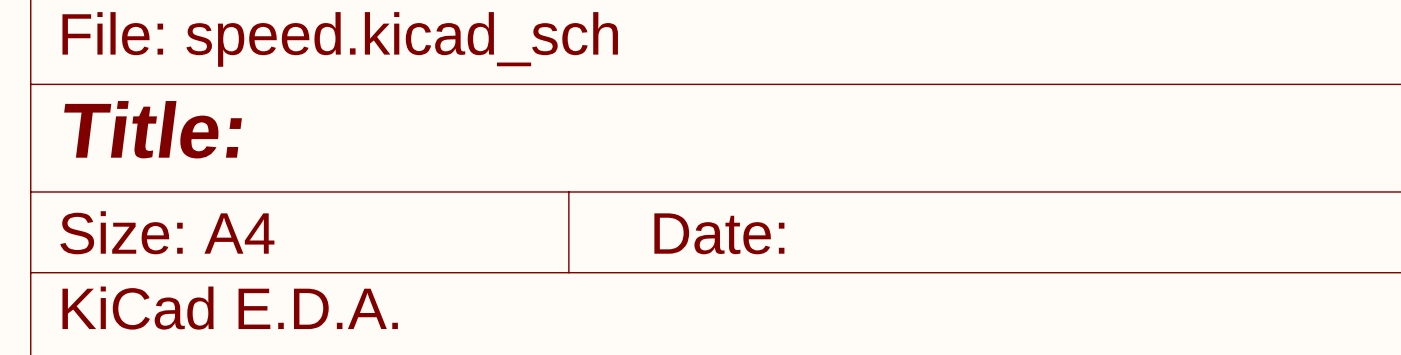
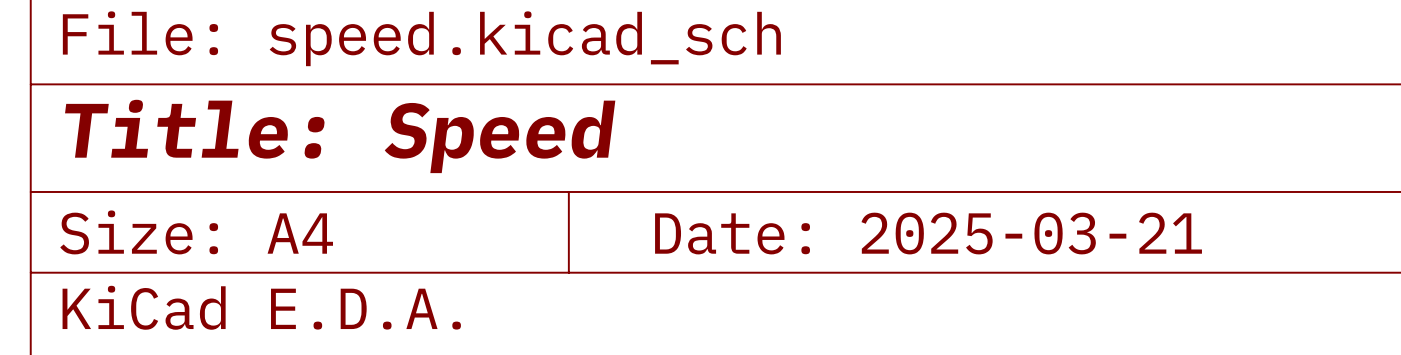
title block: Title: (153, 129) -> Title: Speed (340, 136)
title block: Date: (719, 233) -> Date: 2025-03-21 (928, 233)

